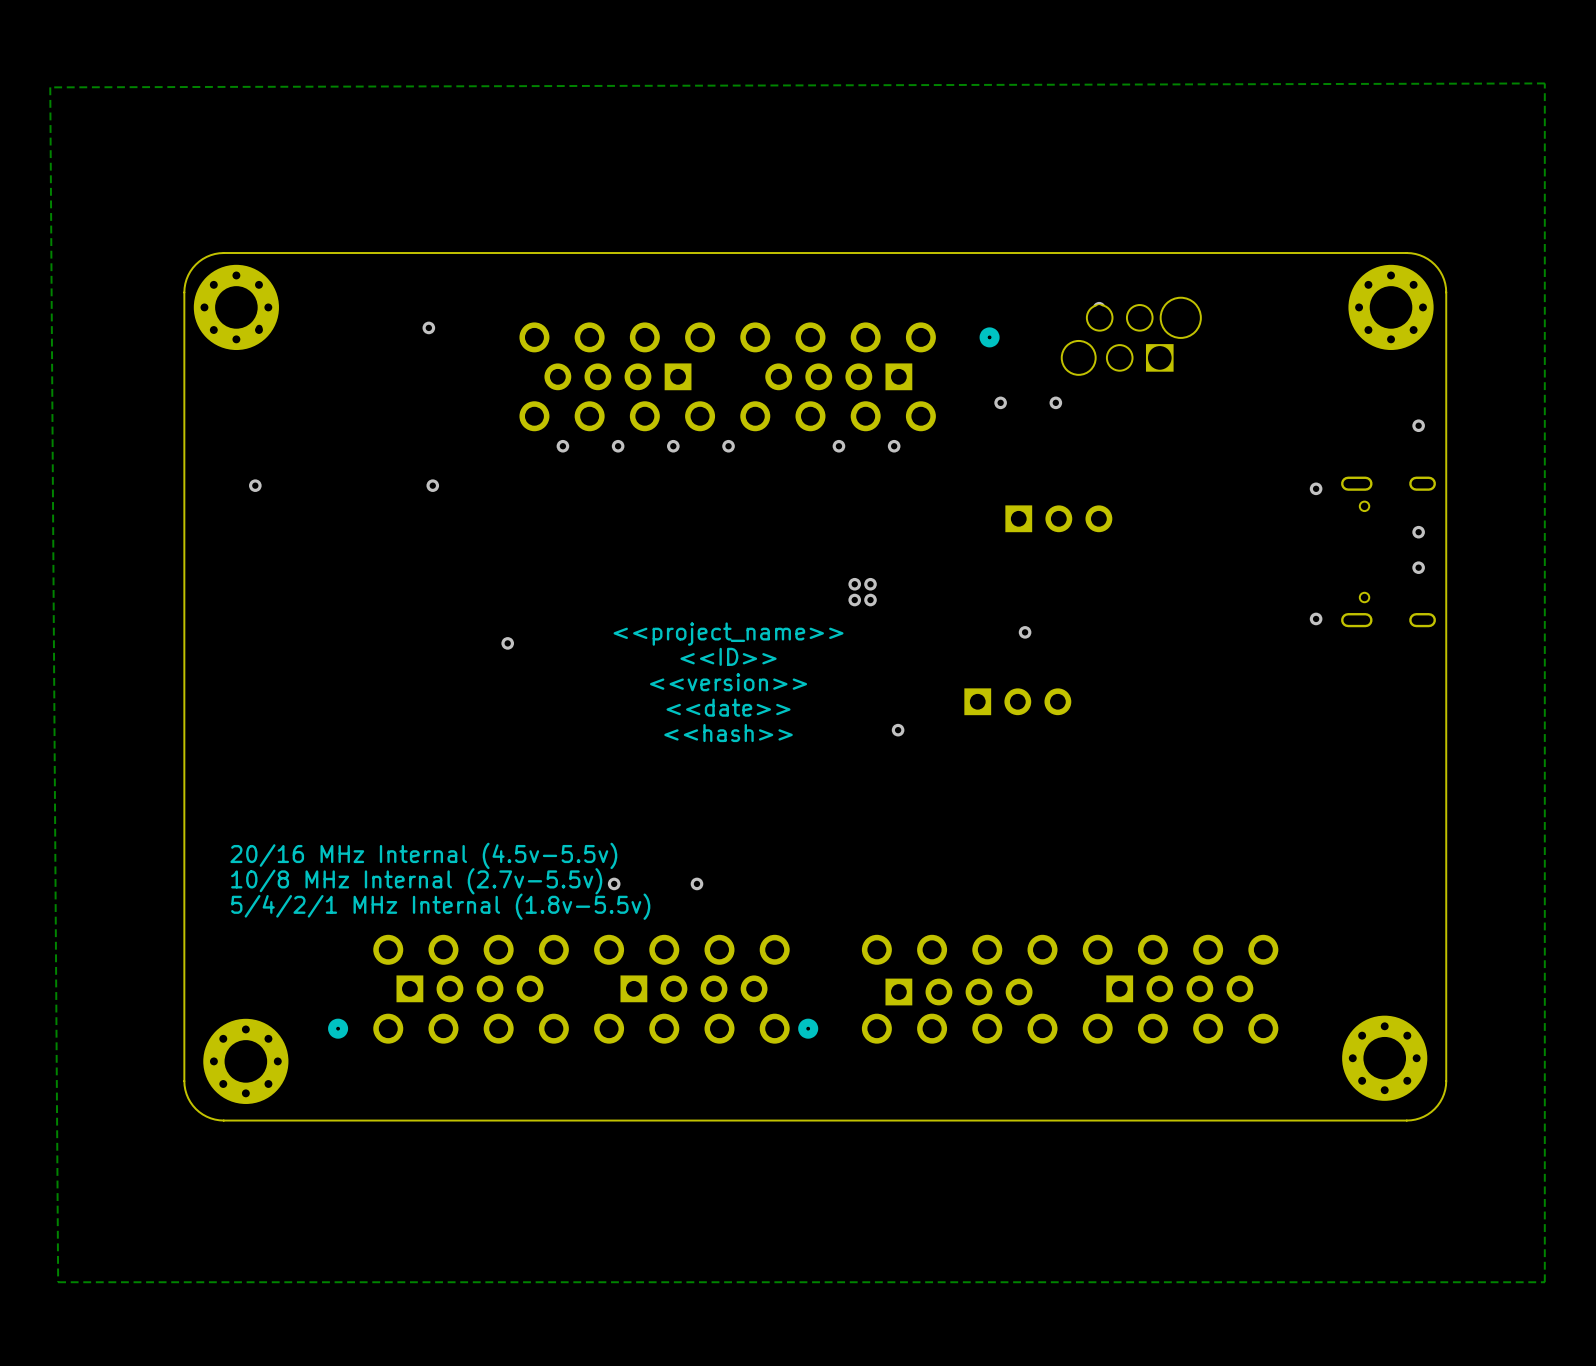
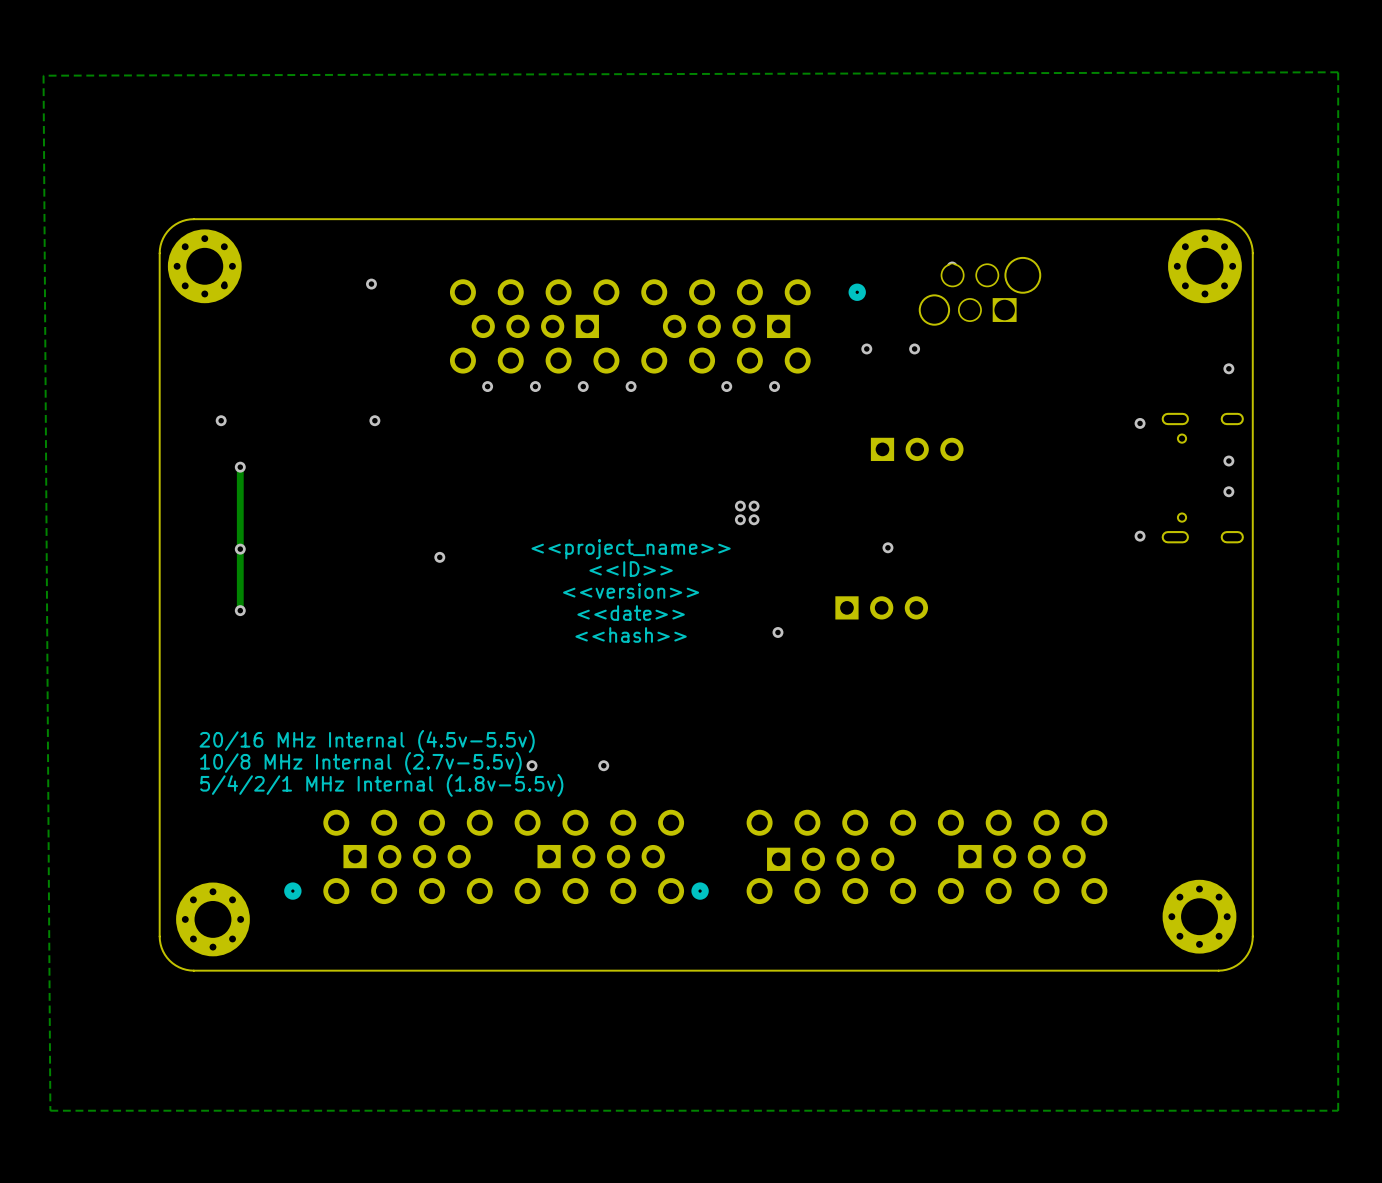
via: none -> (240, 467)
track: none -> (240, 468) (240, 610)
via: none -> (240, 549)
via: none -> (240, 610)

